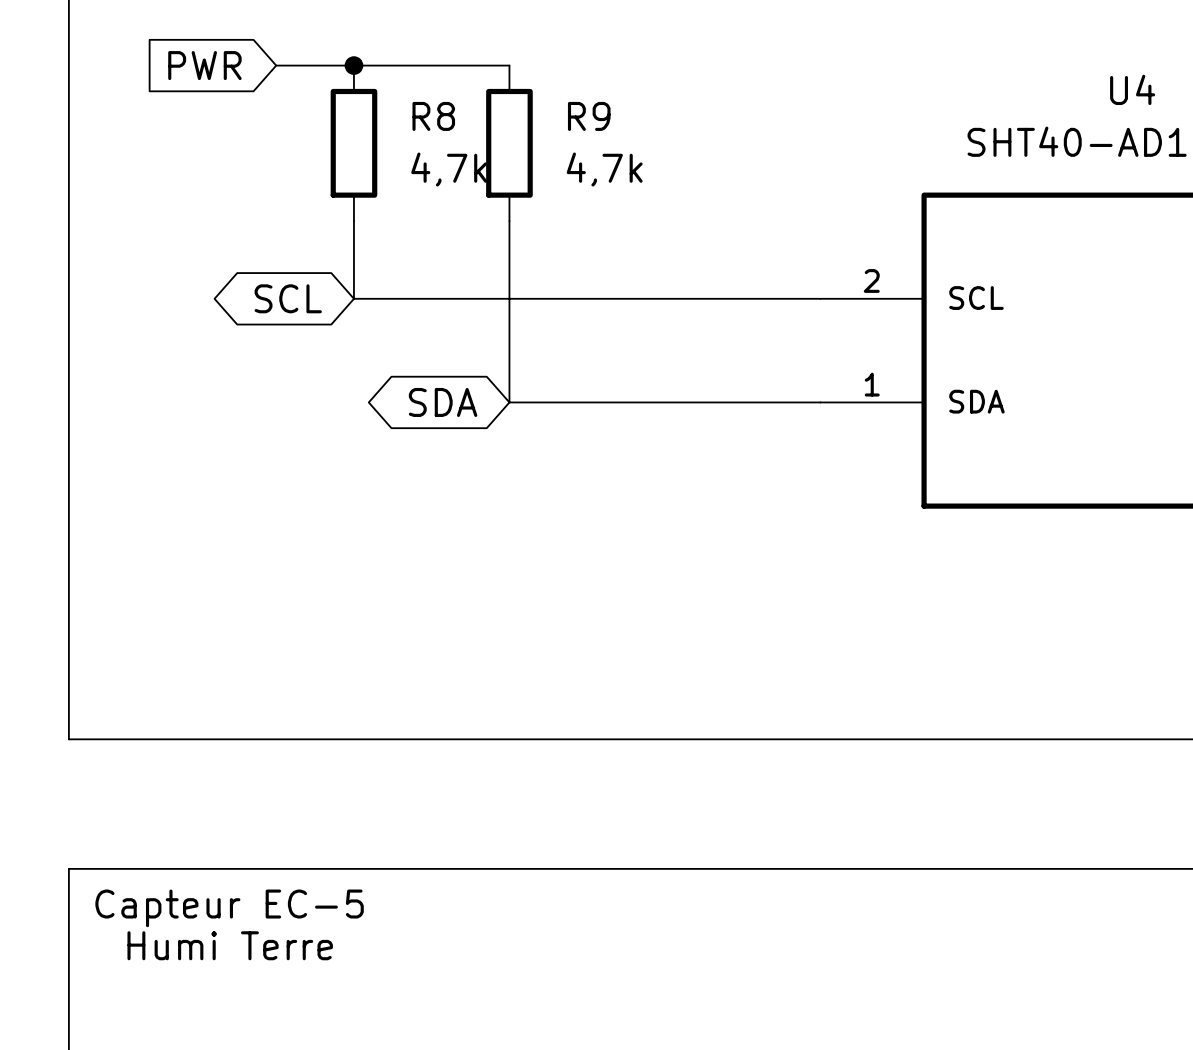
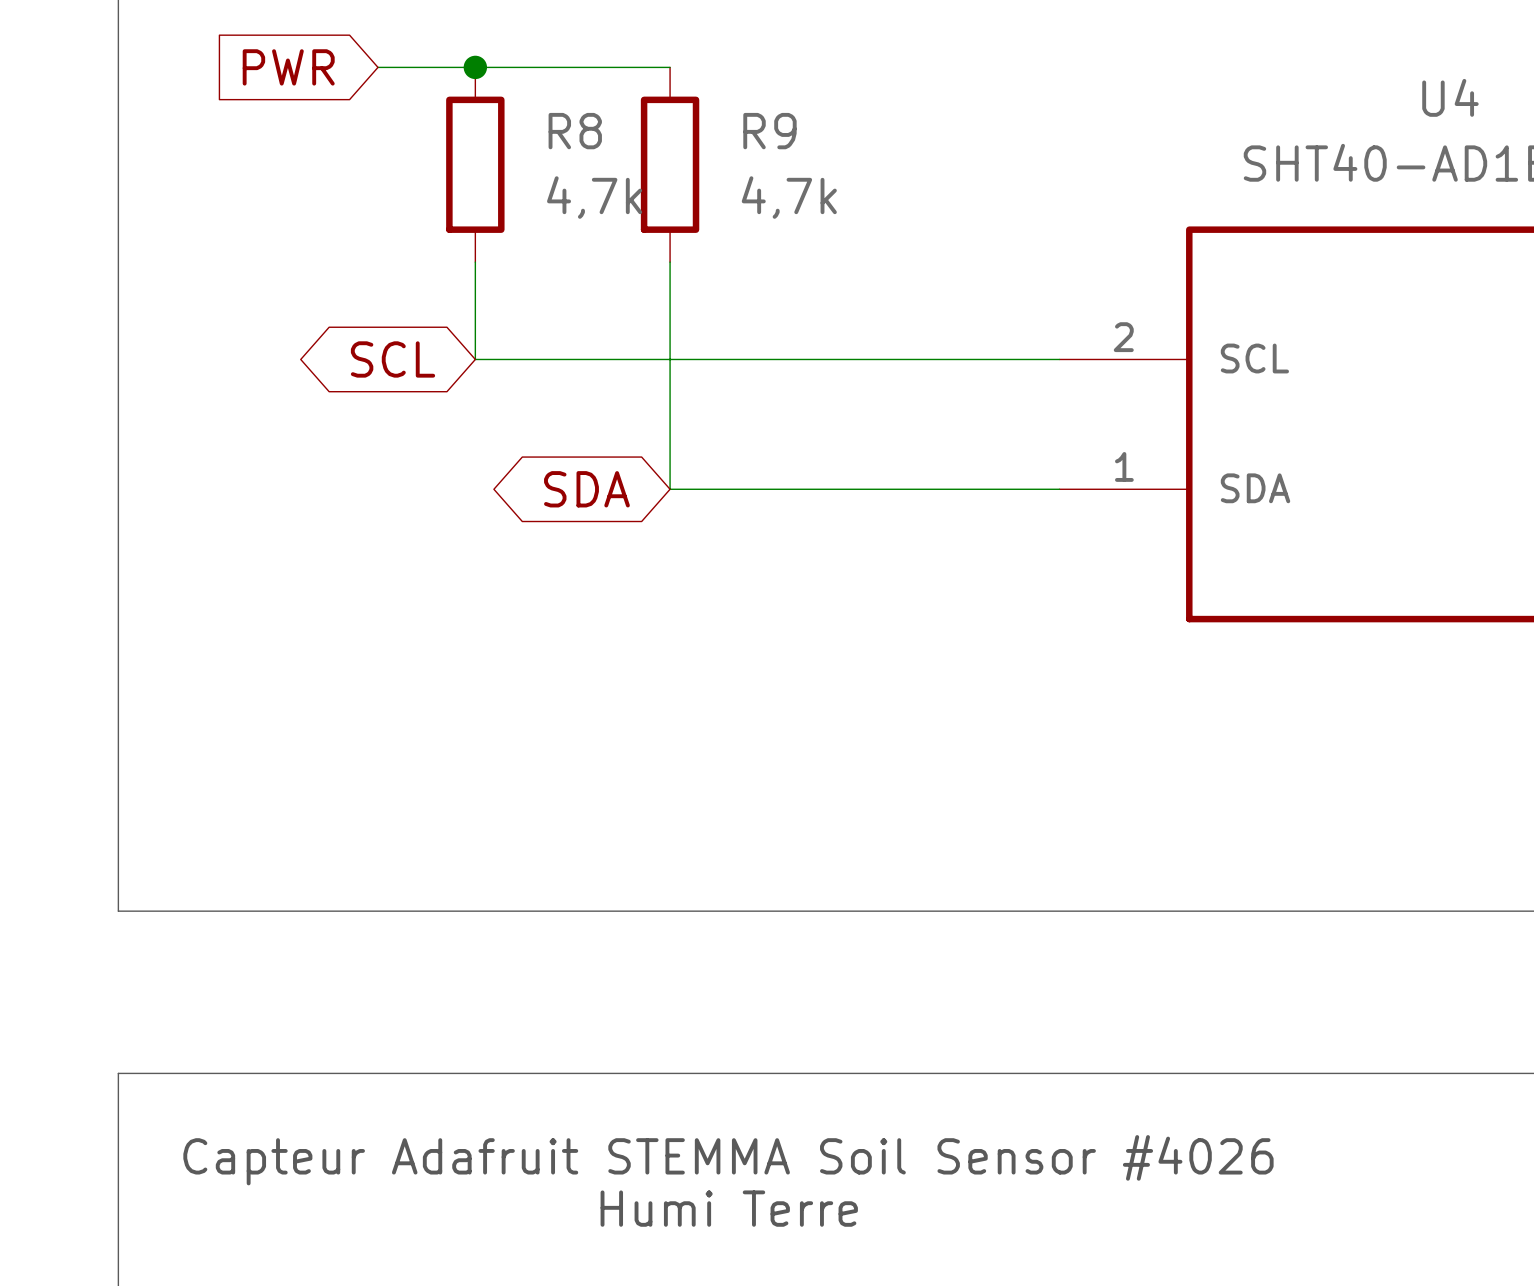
text: Capteur EC-5 (229, 908) -> none
text: none -> Capteur Adafruit STEMMA Soil Sensor #4026 (728, 1160)
text position: Humi Terre (230, 945) -> Humi Terre (729, 1208)

